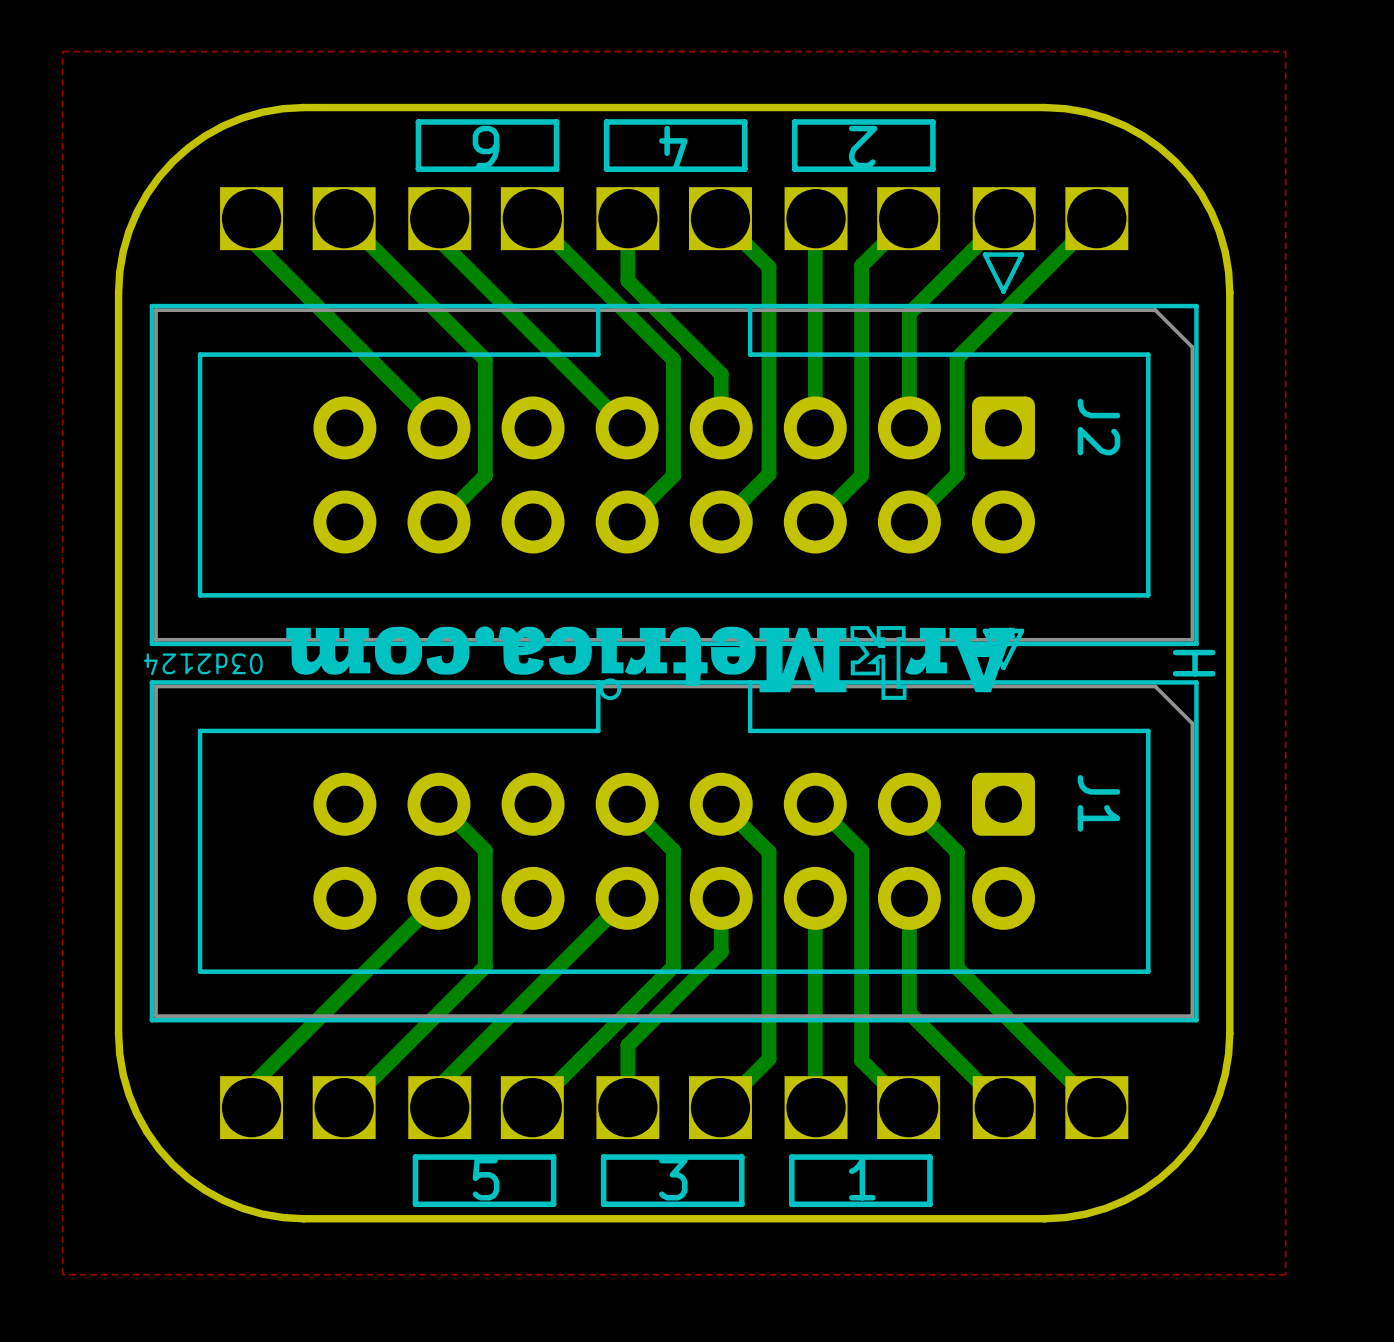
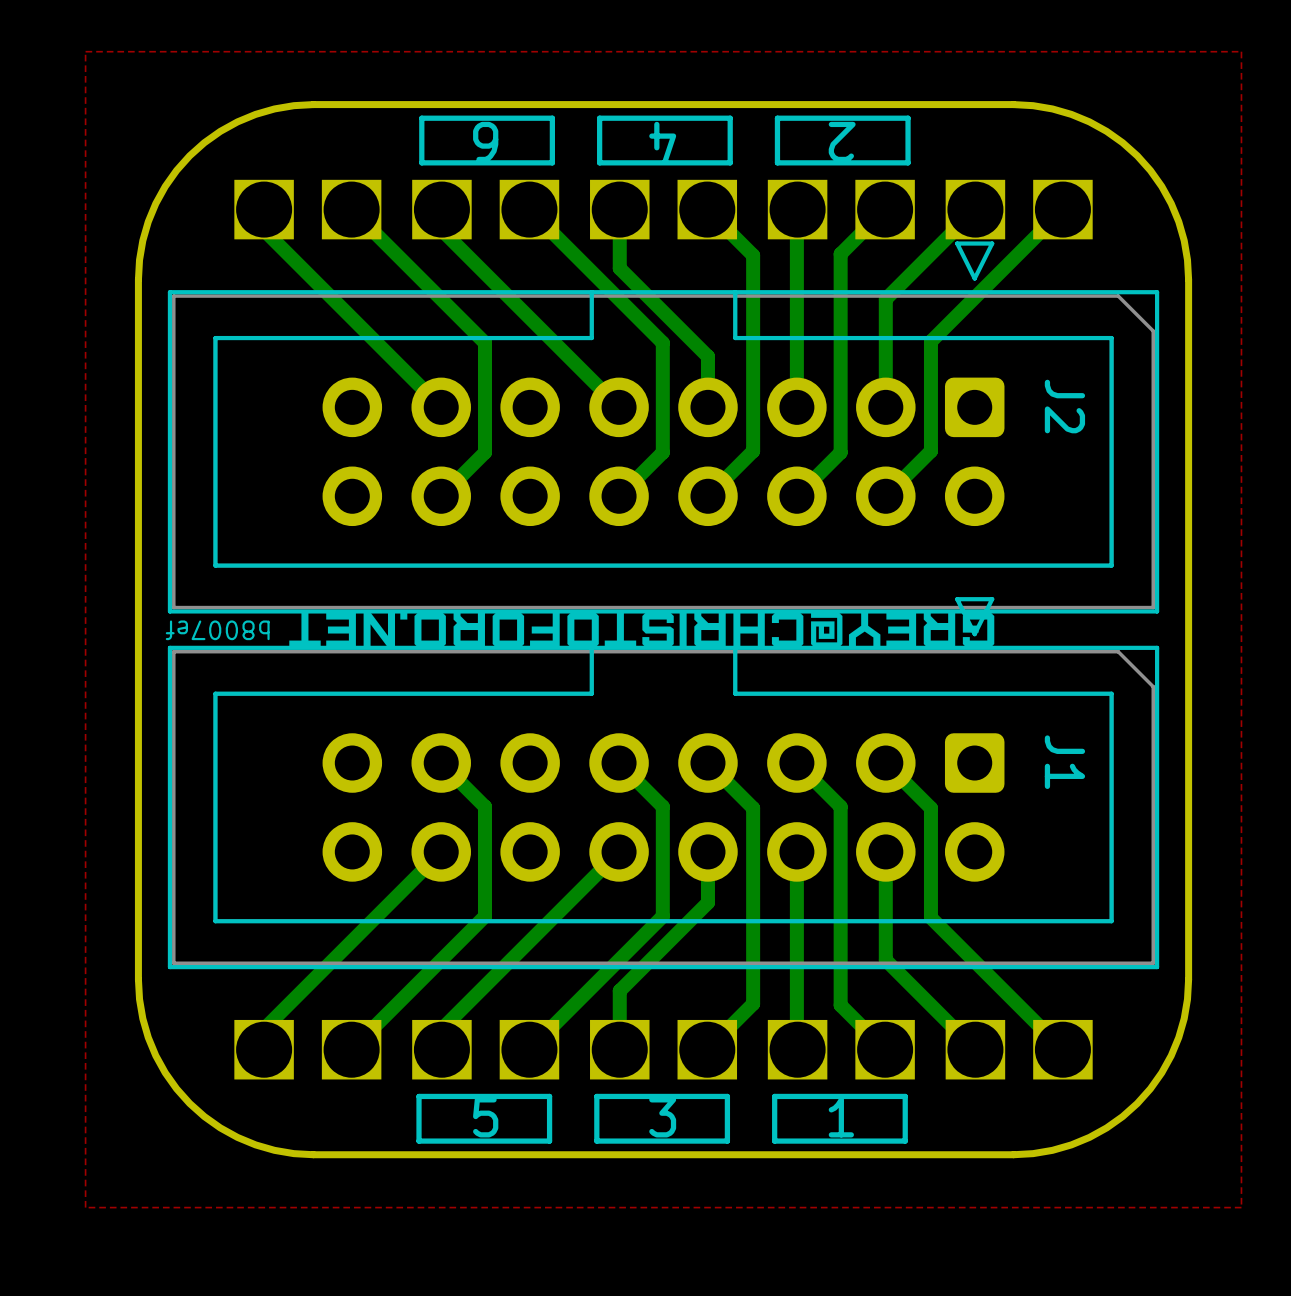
drawing shape: [286, 626, 1015, 701] -> [289, 612, 995, 648]
text: H (1194, 663) -> none
text: 03d2124 (203, 664) -> b8007ef (217, 630)

